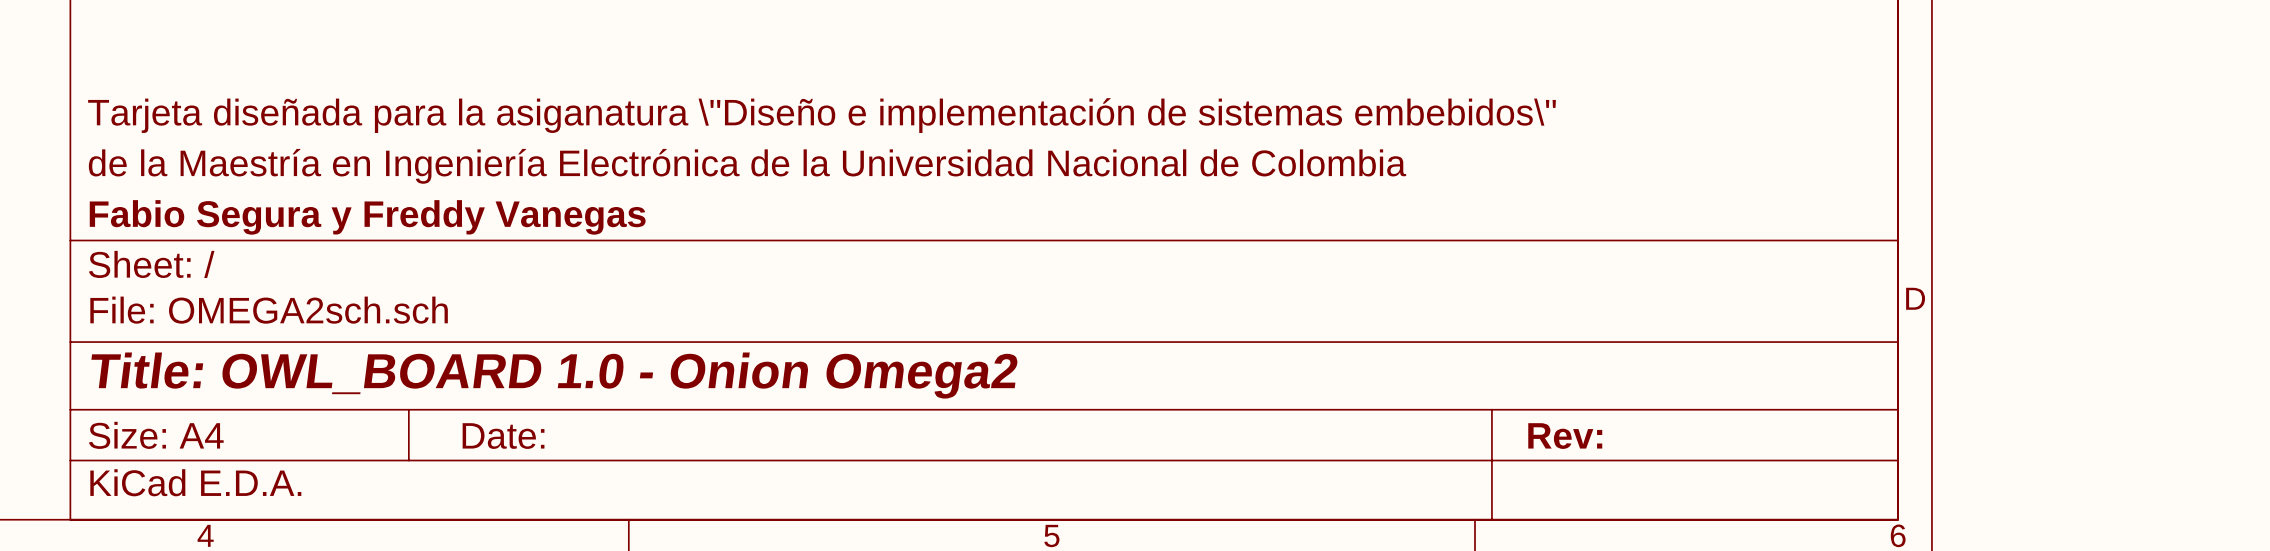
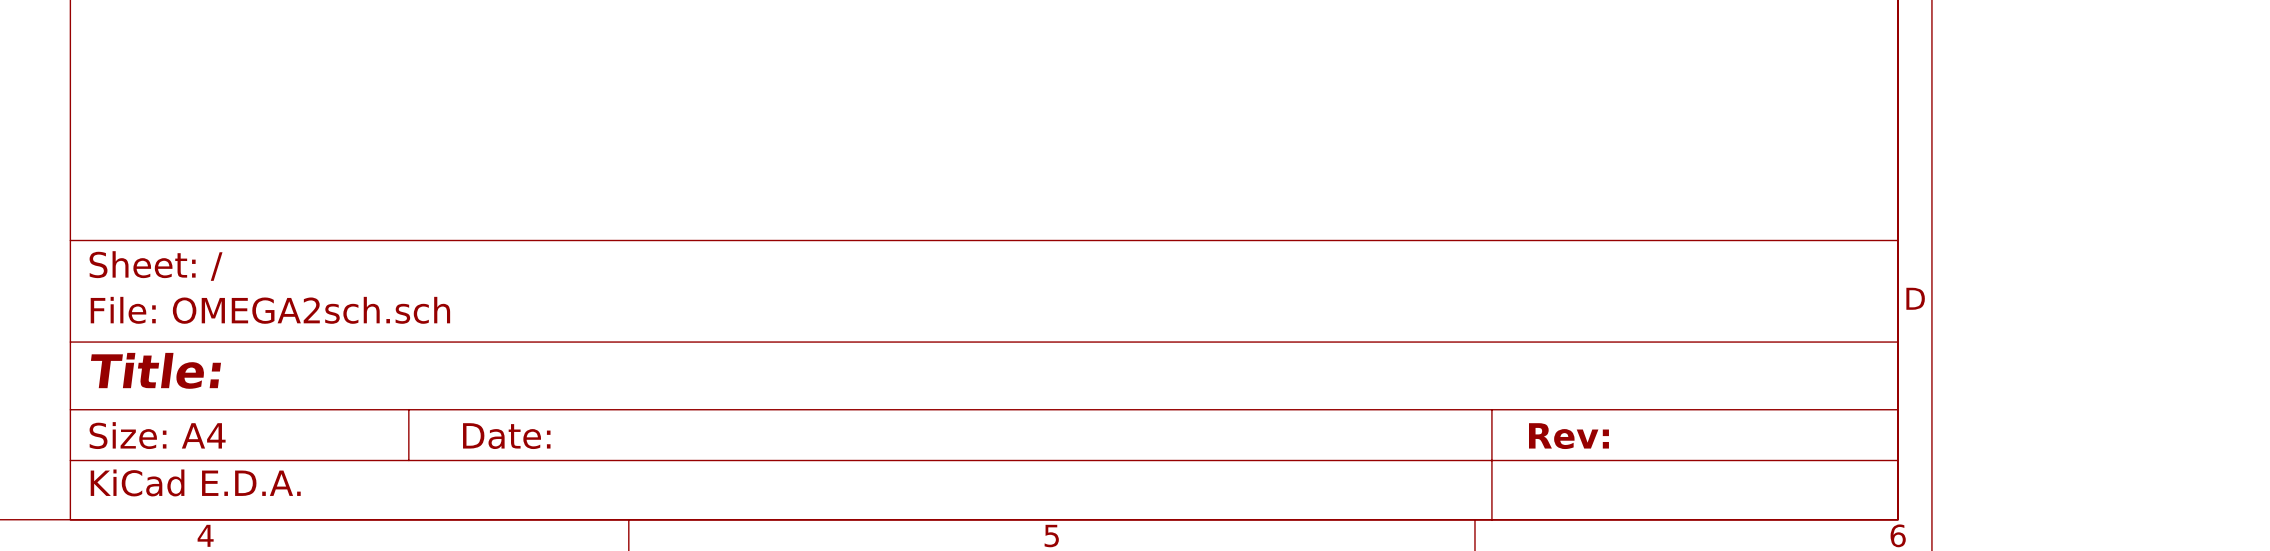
title block: Tarjeta diseñada para la asiganatura \"Diseño e implementación de sistemas embebidos\" (822, 115) -> none
title block: de la Maestría en Ingeniería Electrónica de la Universidad Nacional de Colombia (747, 166) -> none
title block: Fabio Segura y Freddy Vanegas (367, 217) -> none
title block: Title: OWL_BOARD 1.0 - Onion Omega2 (554, 375) -> Title: (155, 370)

